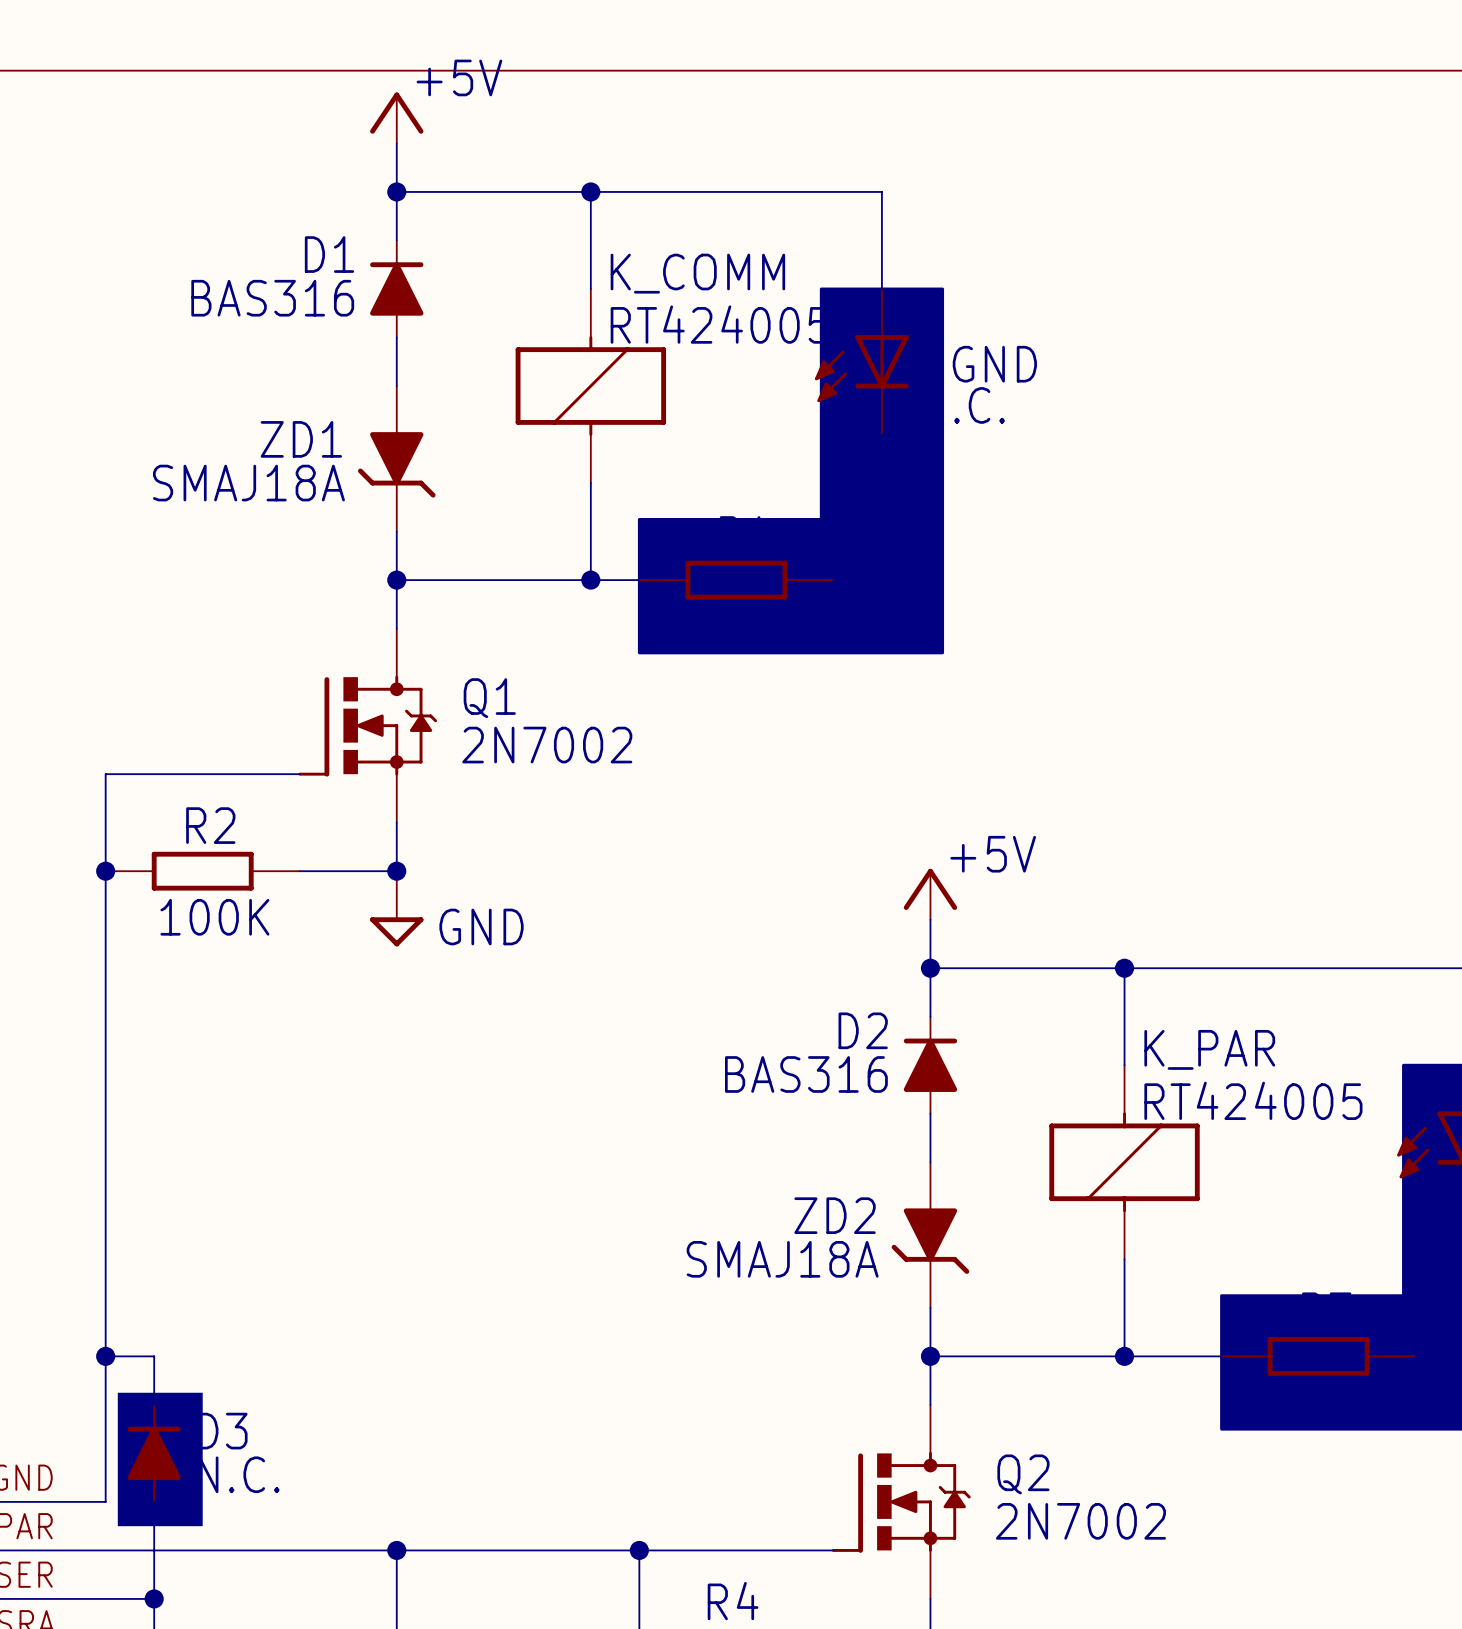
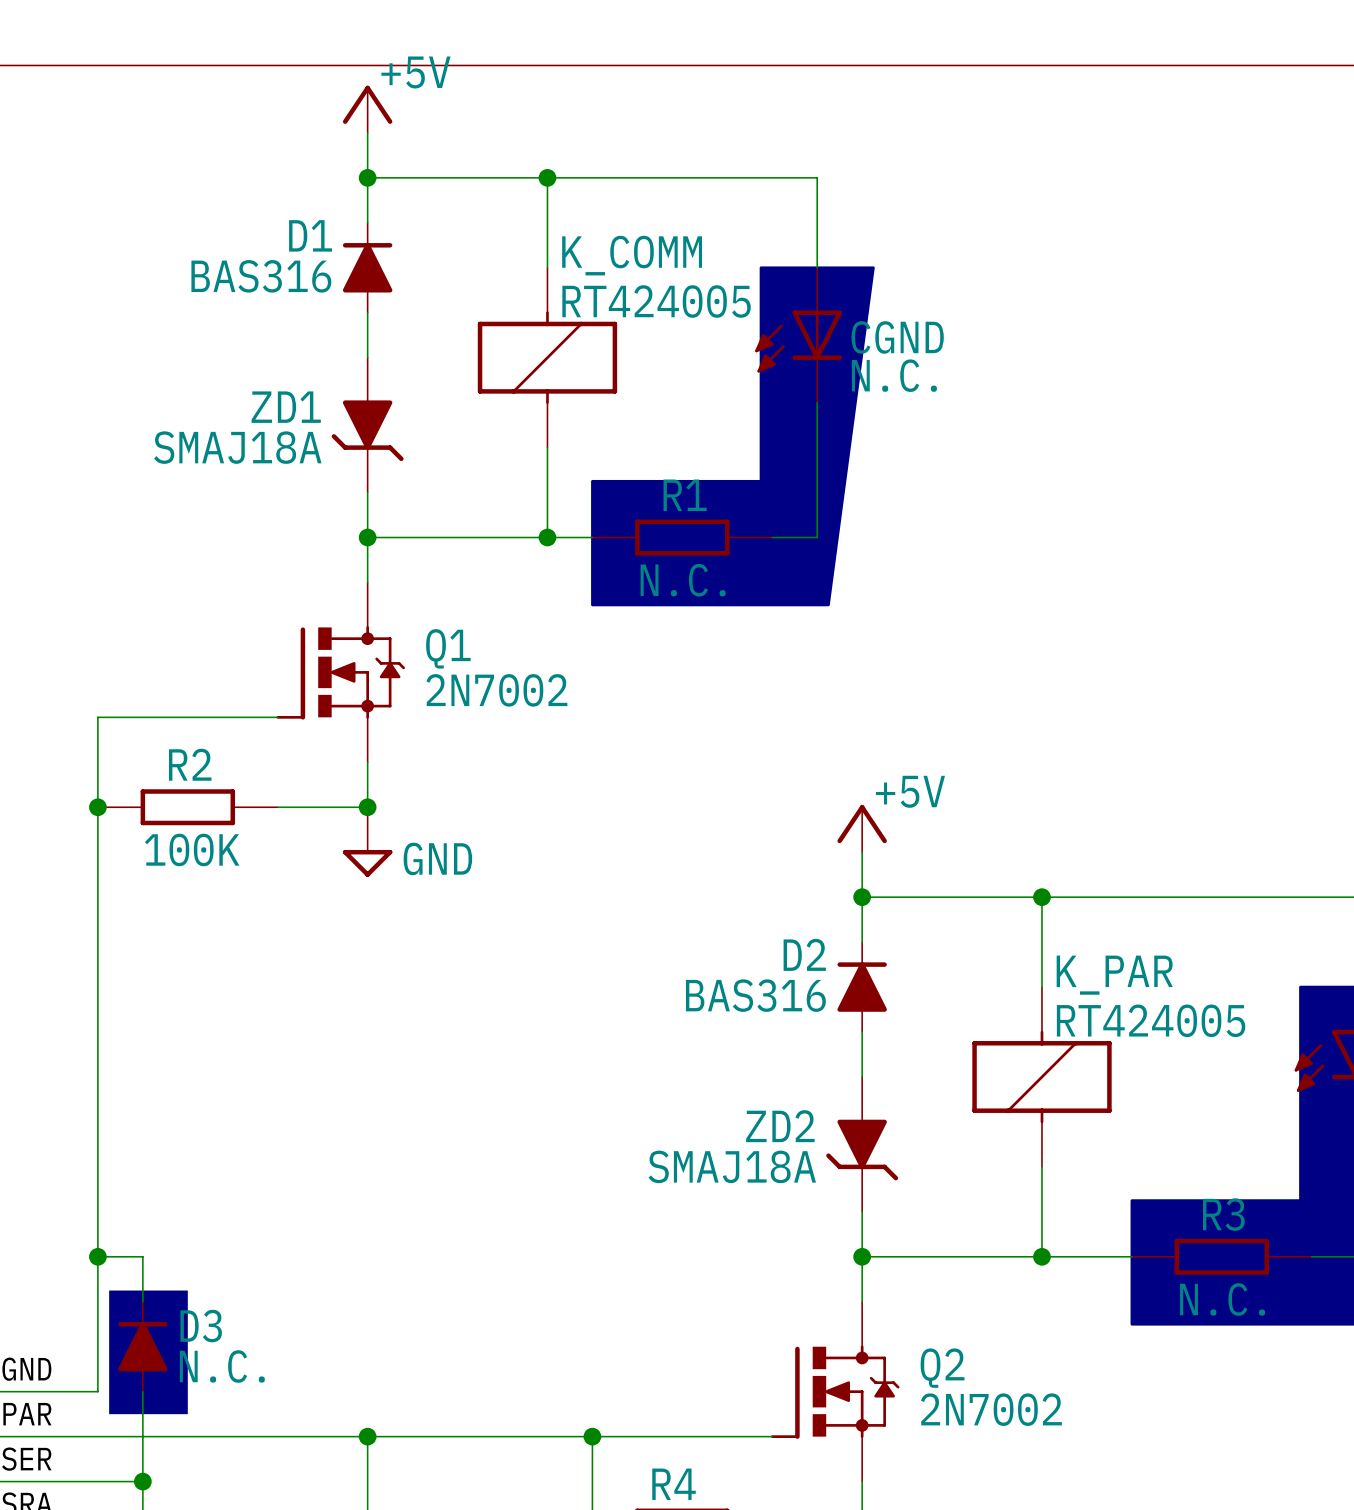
drawing shape: [637, 287, 945, 655] -> [591, 266, 875, 607]

